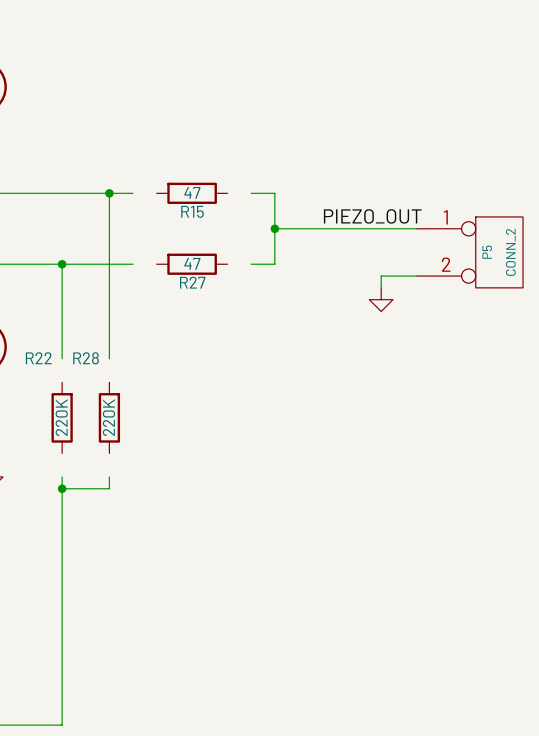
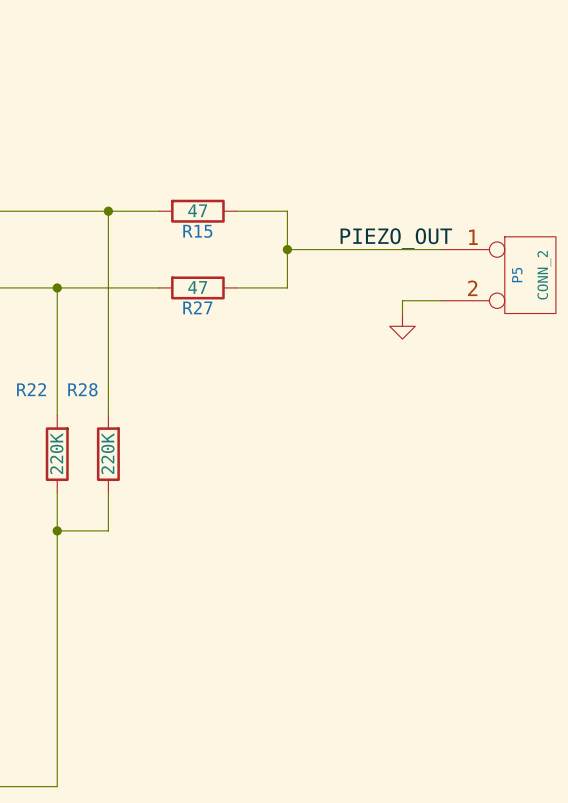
wire: none -> (133, 211) (159, 211)
wire: none -> (236, 211) (261, 211)
wire: none -> (133, 287) (159, 287)
wire: none -> (236, 287) (261, 287)
wire: none -> (57, 390) (57, 415)
wire: none -> (108, 390) (108, 415)
wire: none -> (57, 492) (57, 518)
wire: none -> (108, 492) (108, 518)

